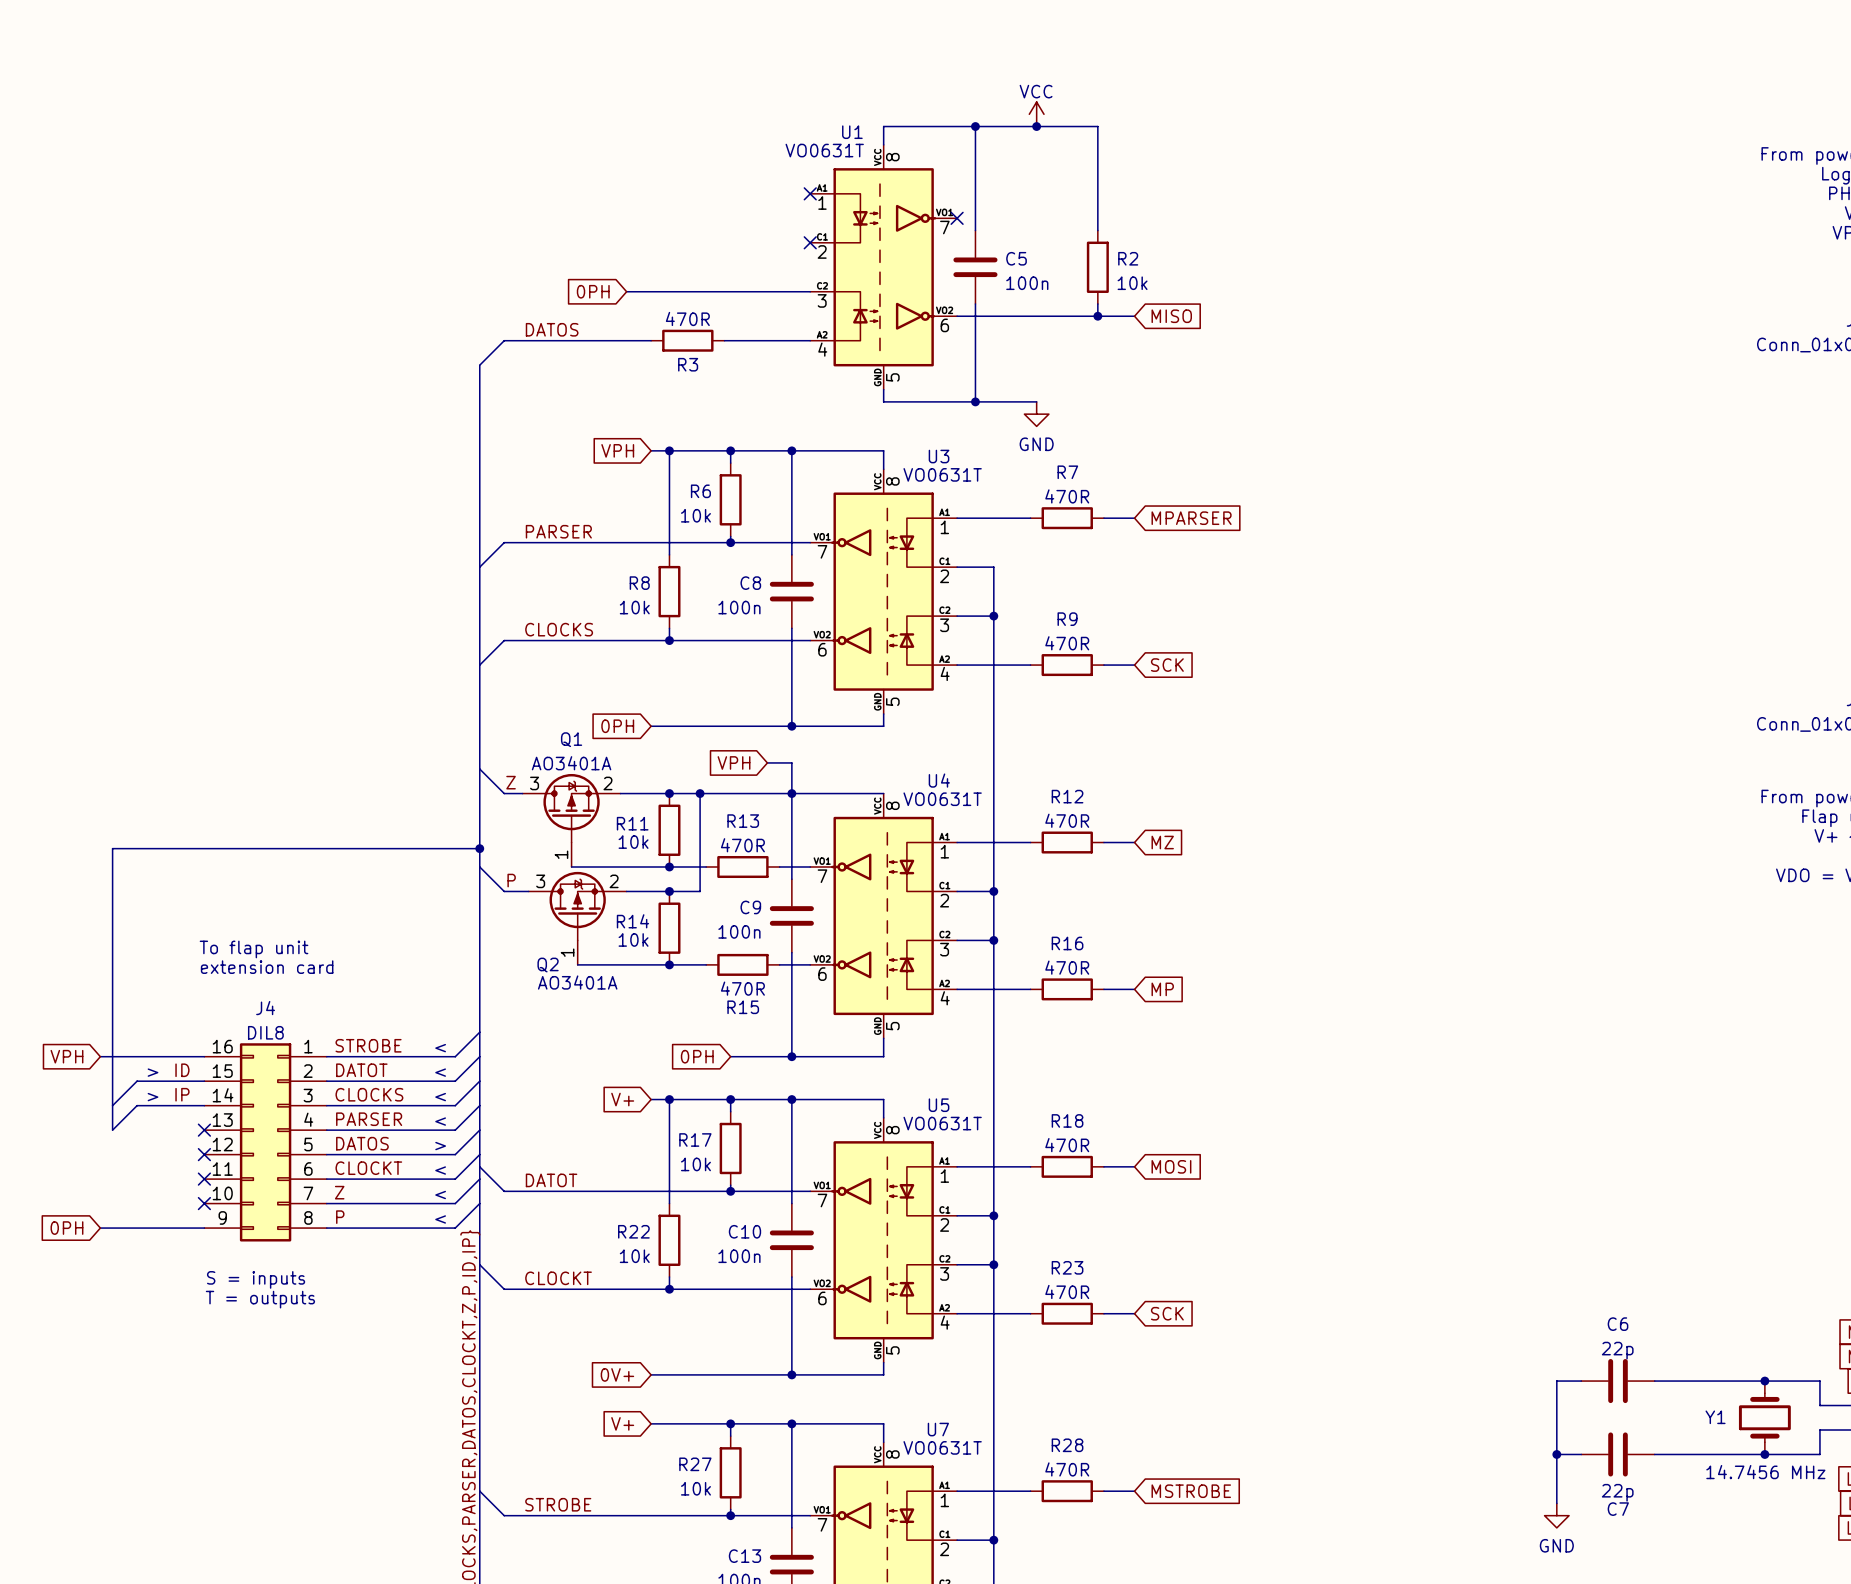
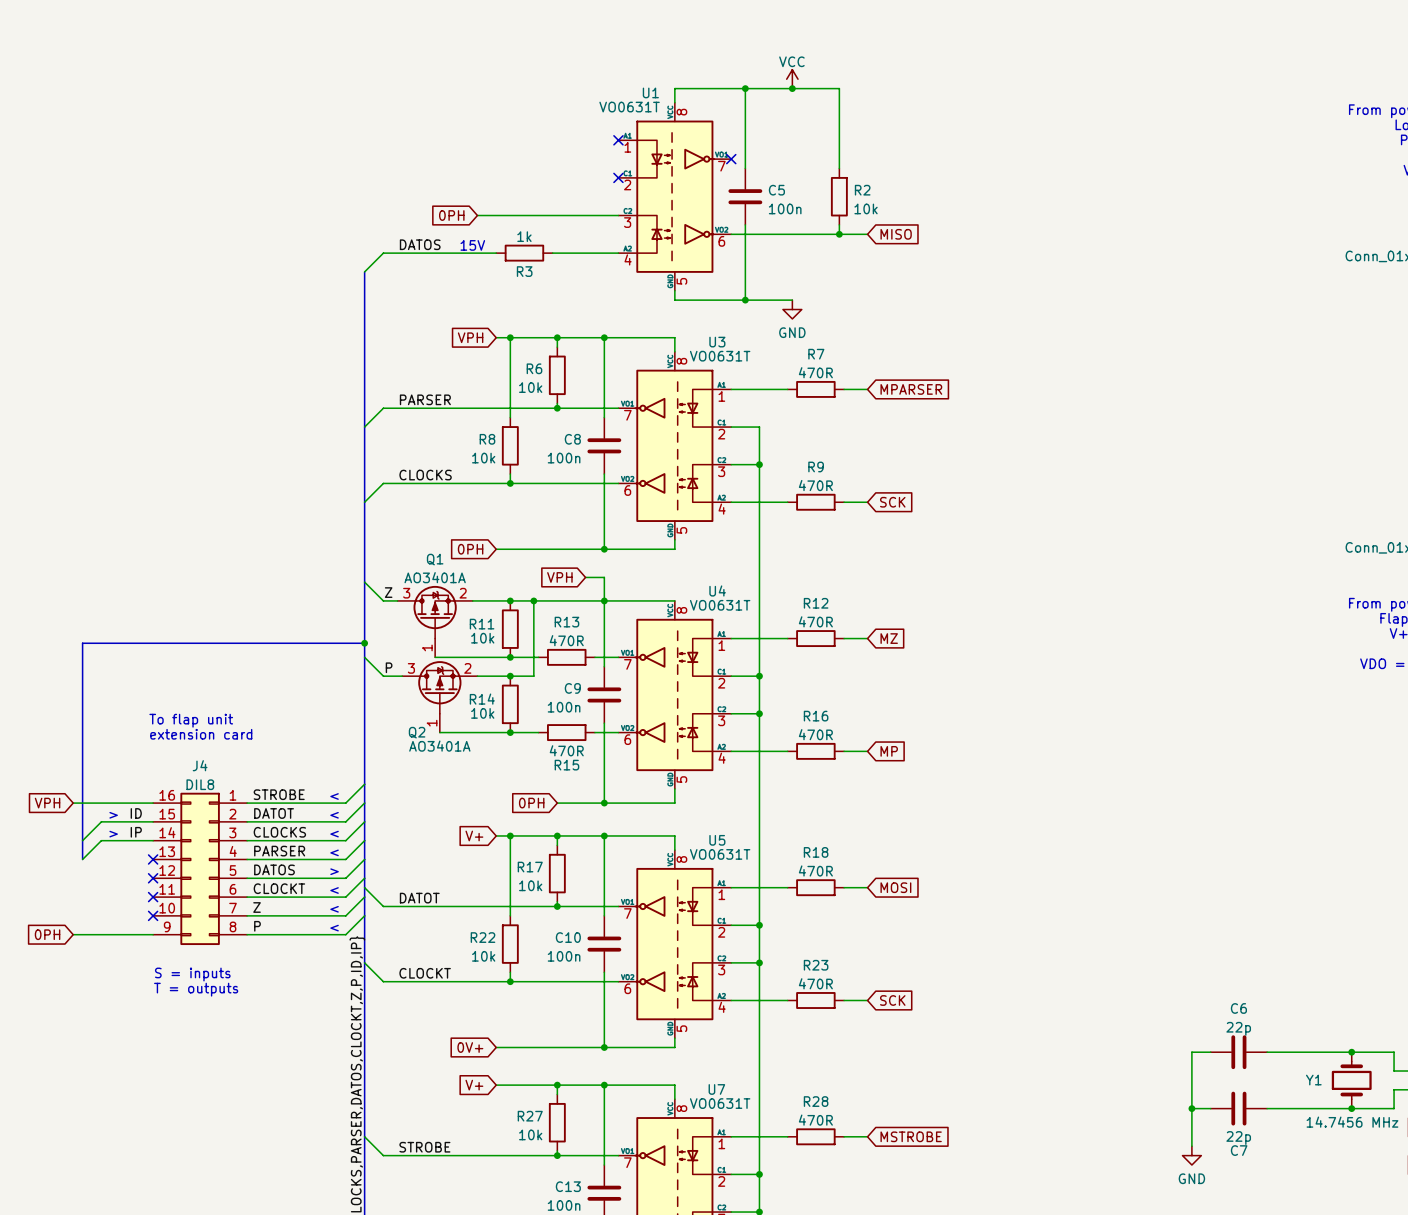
R3 value: 470R (687, 318) -> 1k (524, 236)
text: none -> 15V (472, 245)

